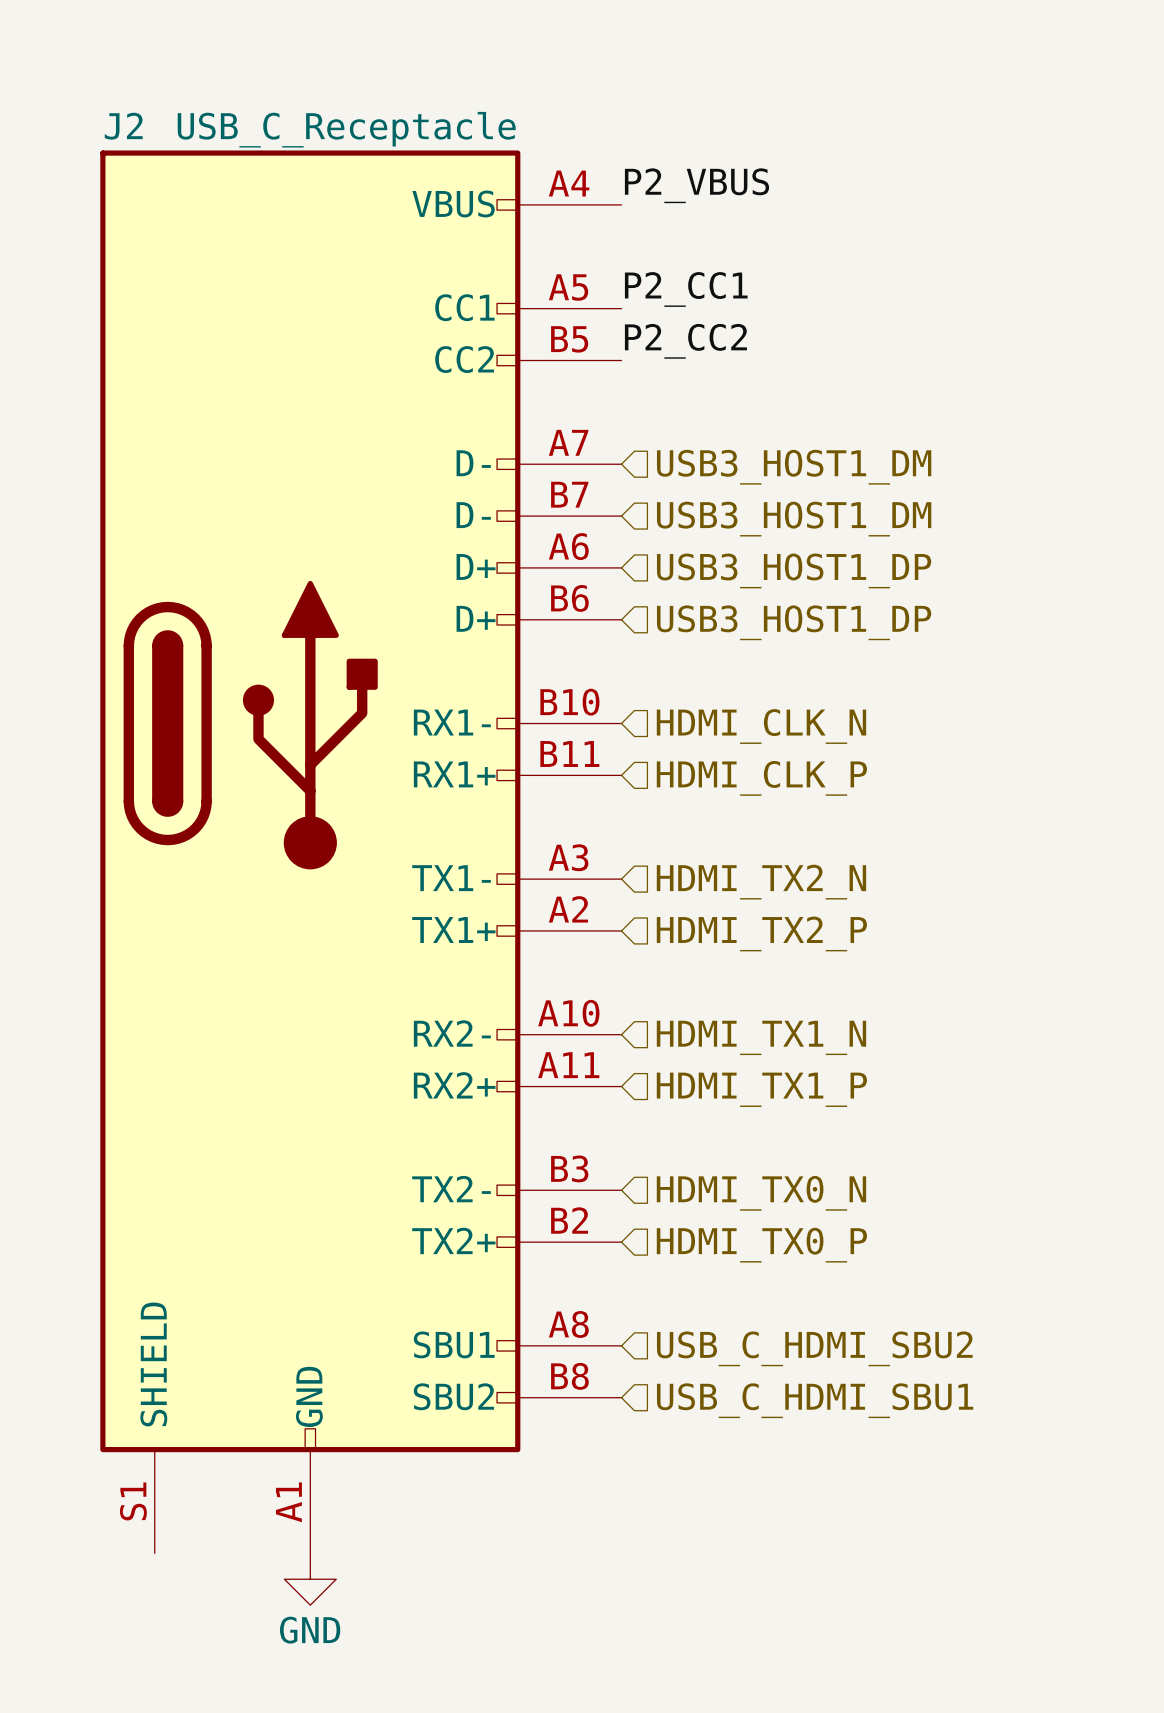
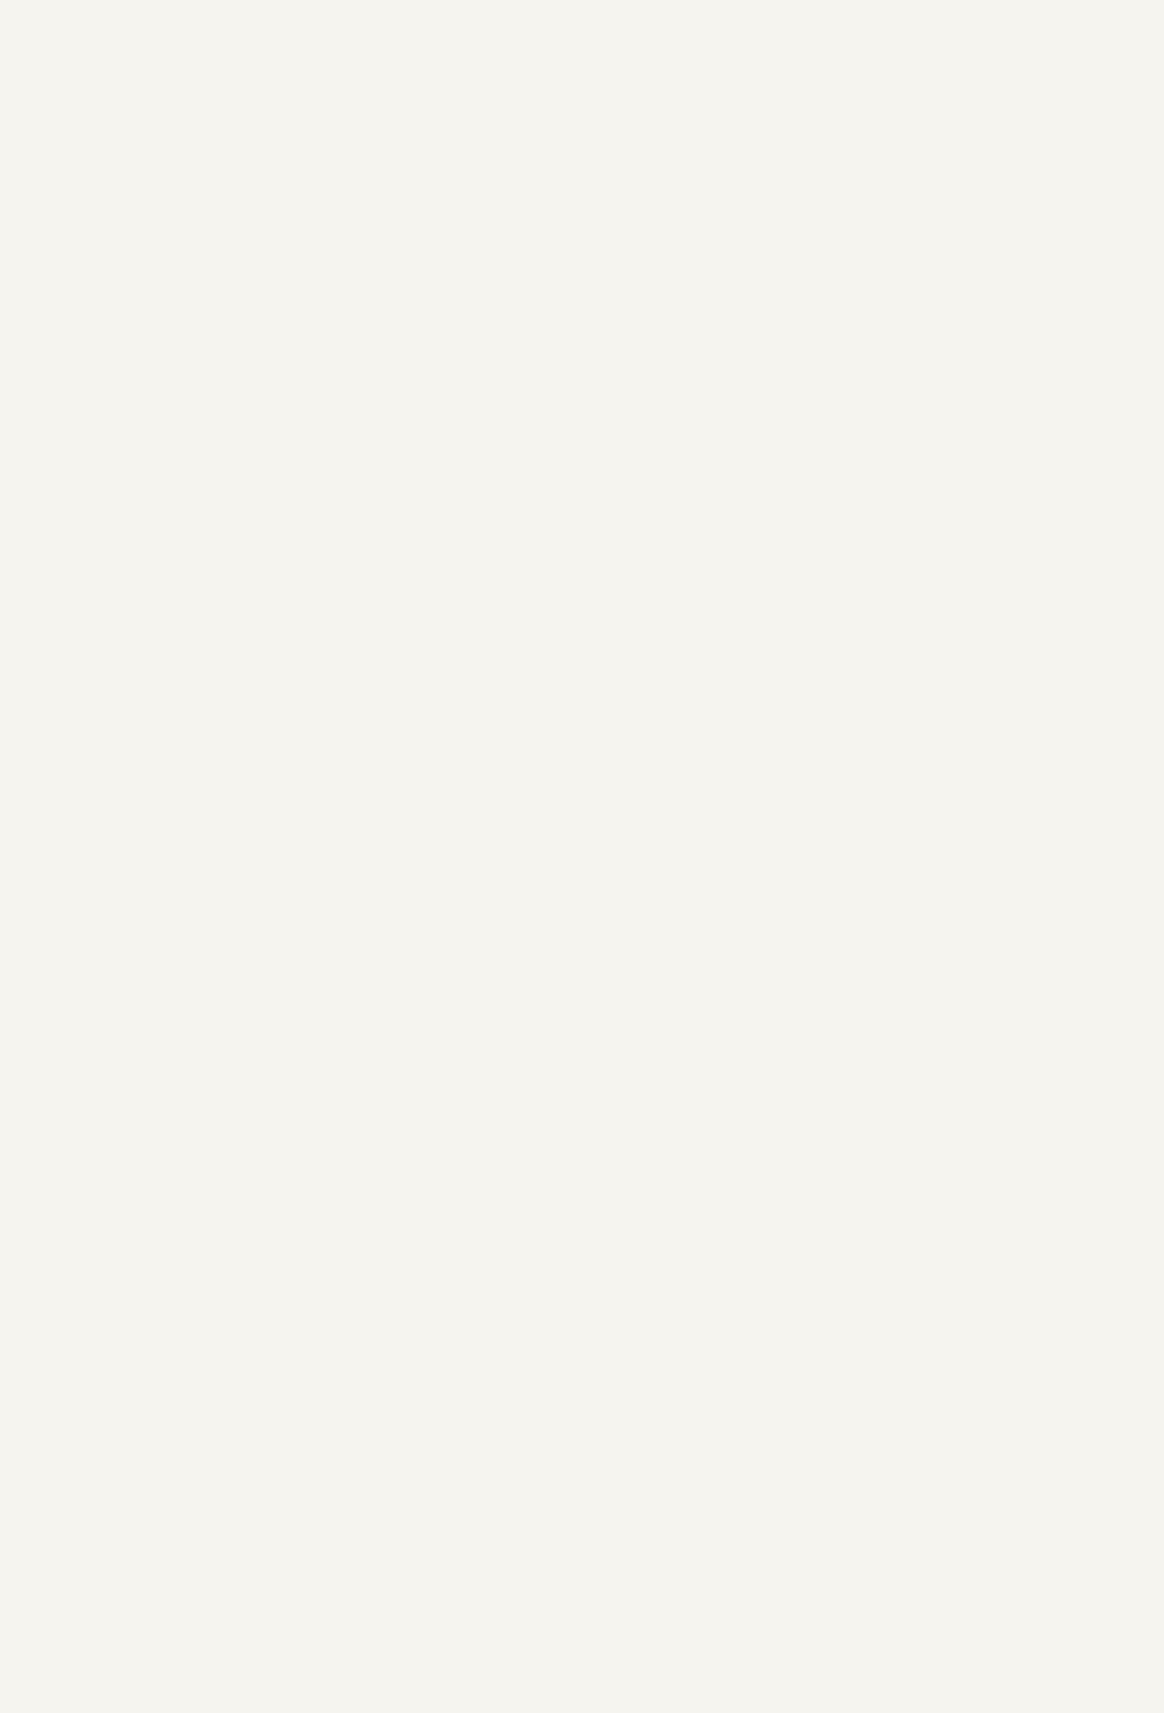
label: P2_VBUS (696, 185) -> none
label: P2_CC1 (686, 289) -> none
label: P2_CC2 (685, 341) -> none
hierarchical label: USB3_HOST1_DM (794, 467) -> none
hierarchical label: USB3_HOST1_DM (794, 519) -> none
hierarchical label: USB3_HOST1_DP (794, 570) -> none
hierarchical label: USB3_HOST1_DP (794, 622) -> none
hierarchical label: HDMI_CLK_N (761, 726) -> none
hierarchical label: HDMI_CLK_P (761, 778) -> none
J2: USB_C_Receptacle (360, 851) -> none
hierarchical label: HDMI_TX2_N (761, 882) -> none
hierarchical label: HDMI_TX2_P (761, 933) -> none
hierarchical label: HDMI_TX1_N (761, 1037) -> none
hierarchical label: HDMI_TX1_P (761, 1089) -> none
hierarchical label: HDMI_TX0_N (761, 1193) -> none
hierarchical label: HDMI_TX0_P (761, 1245) -> none
hierarchical label: USB_C_HDMI_SBU2 (814, 1348) -> none
hierarchical label: USB_C_HDMI_SBU1 (815, 1400) -> none
power symbol: GND (310, 1579) -> none

